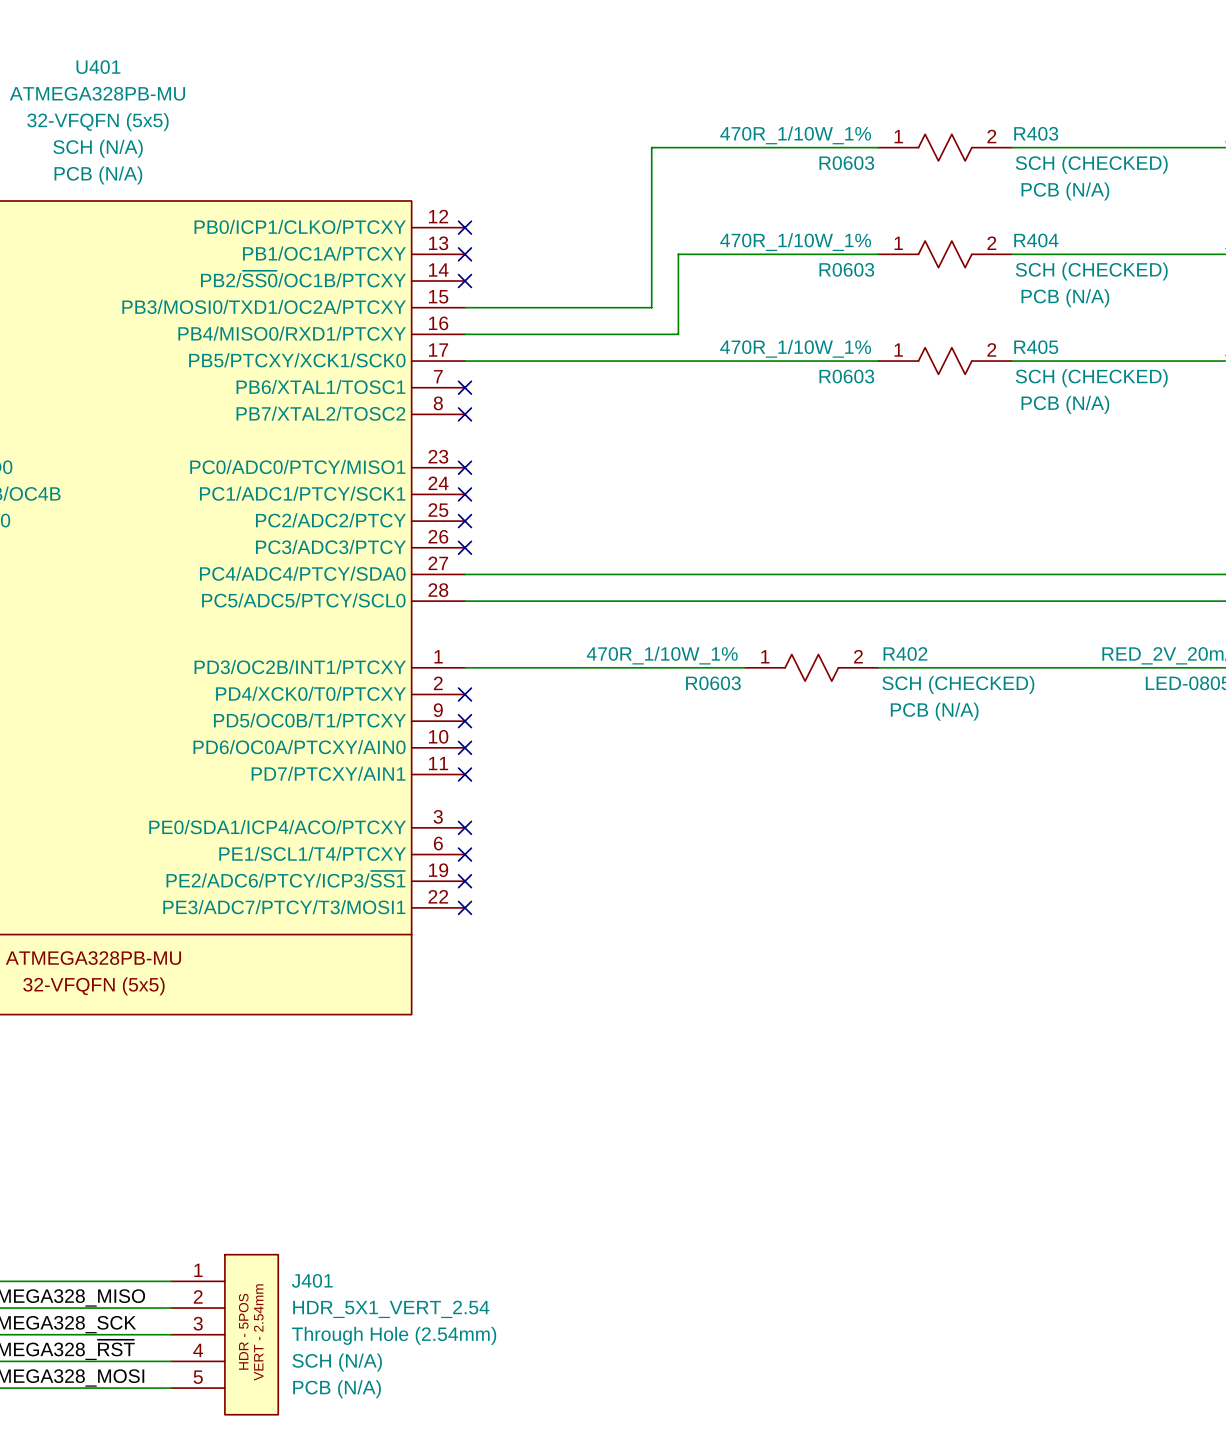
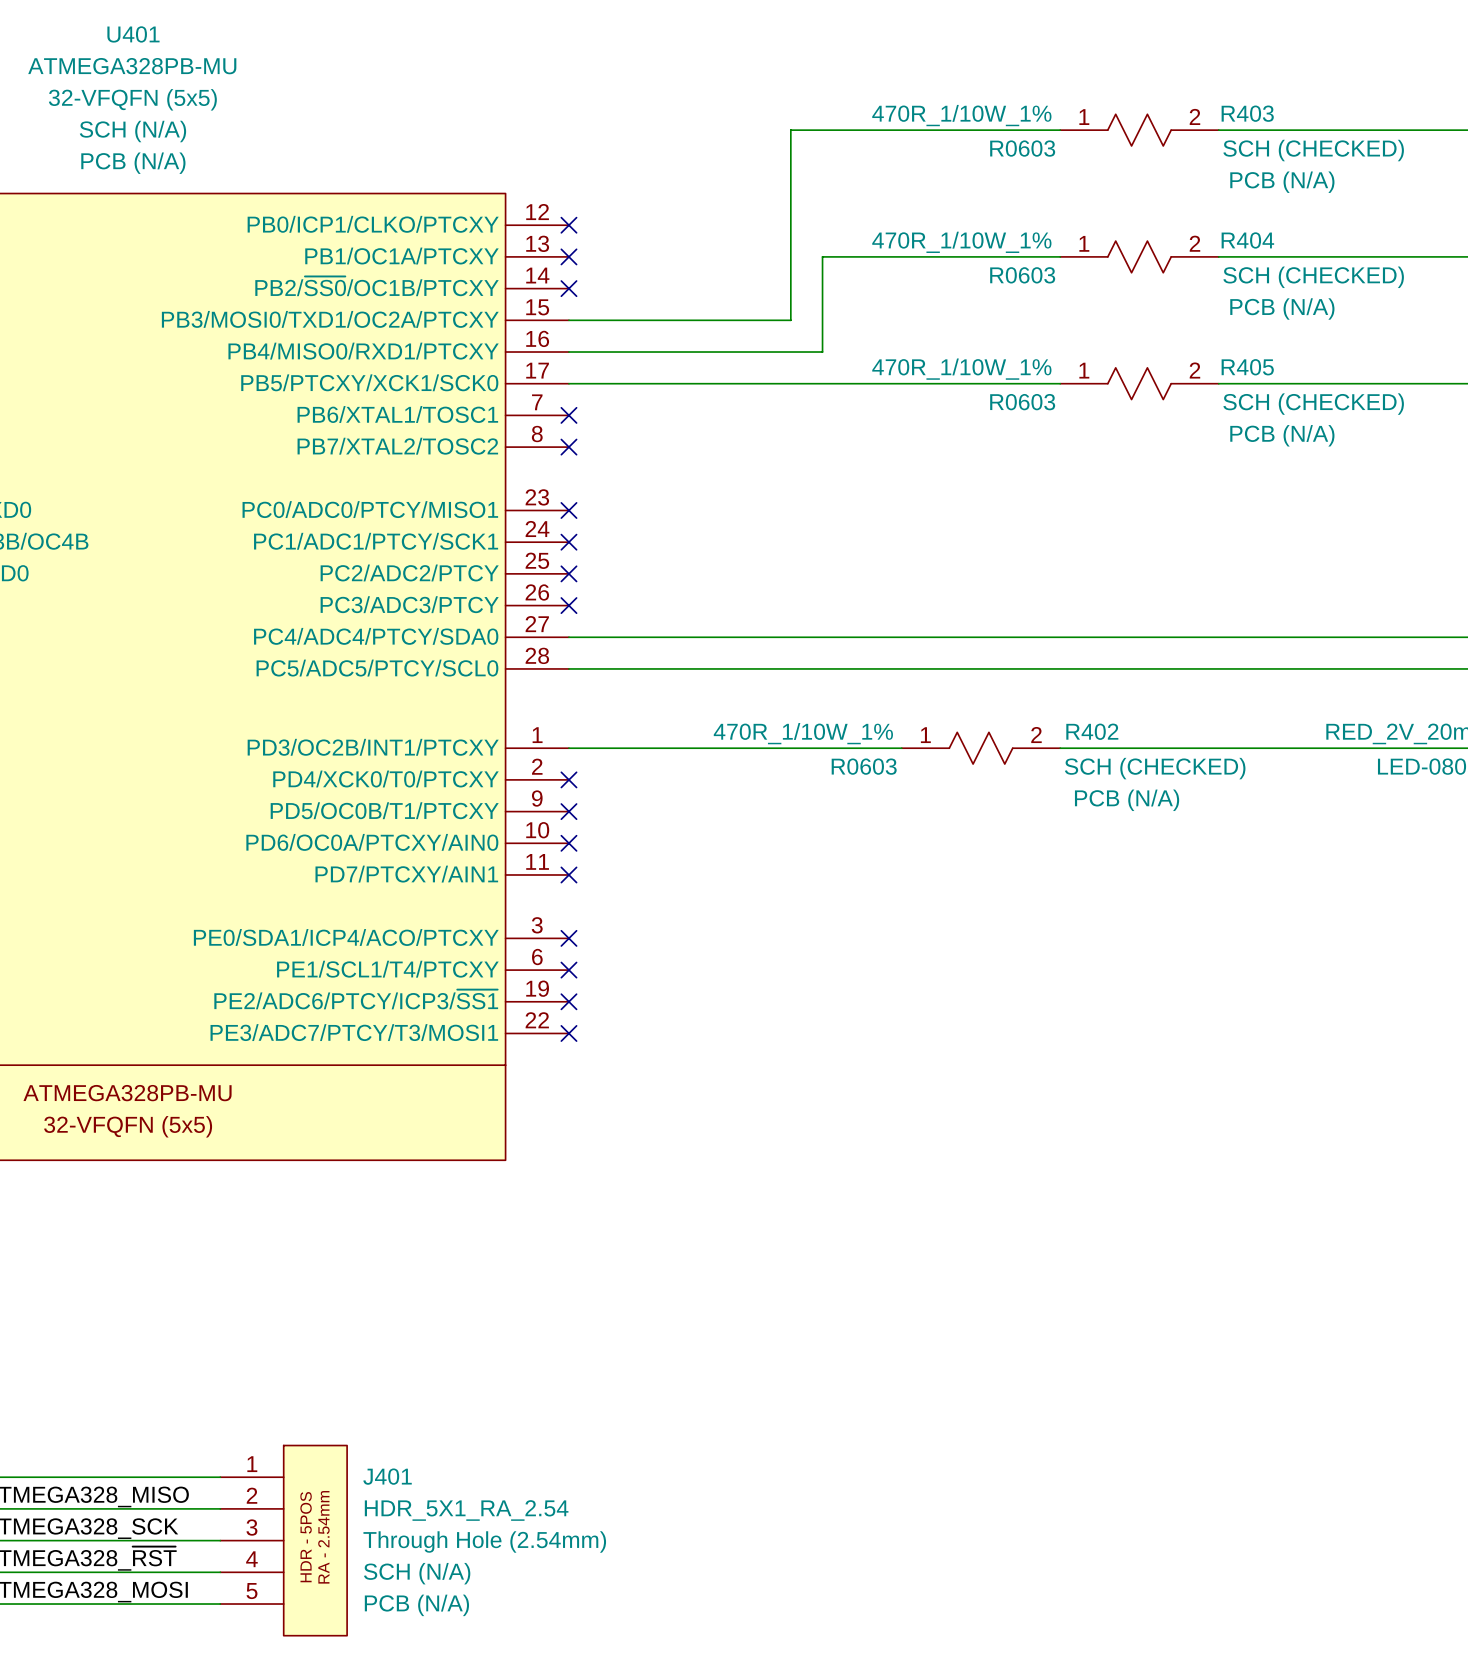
J401 value: HDR_5X1_VERT_2.54 (391, 1309) -> HDR_5X1_RA_2.54 (466, 1510)
J401 text: VERT - 2.54mm (258, 1332) -> RA - 2.54mm (323, 1537)

